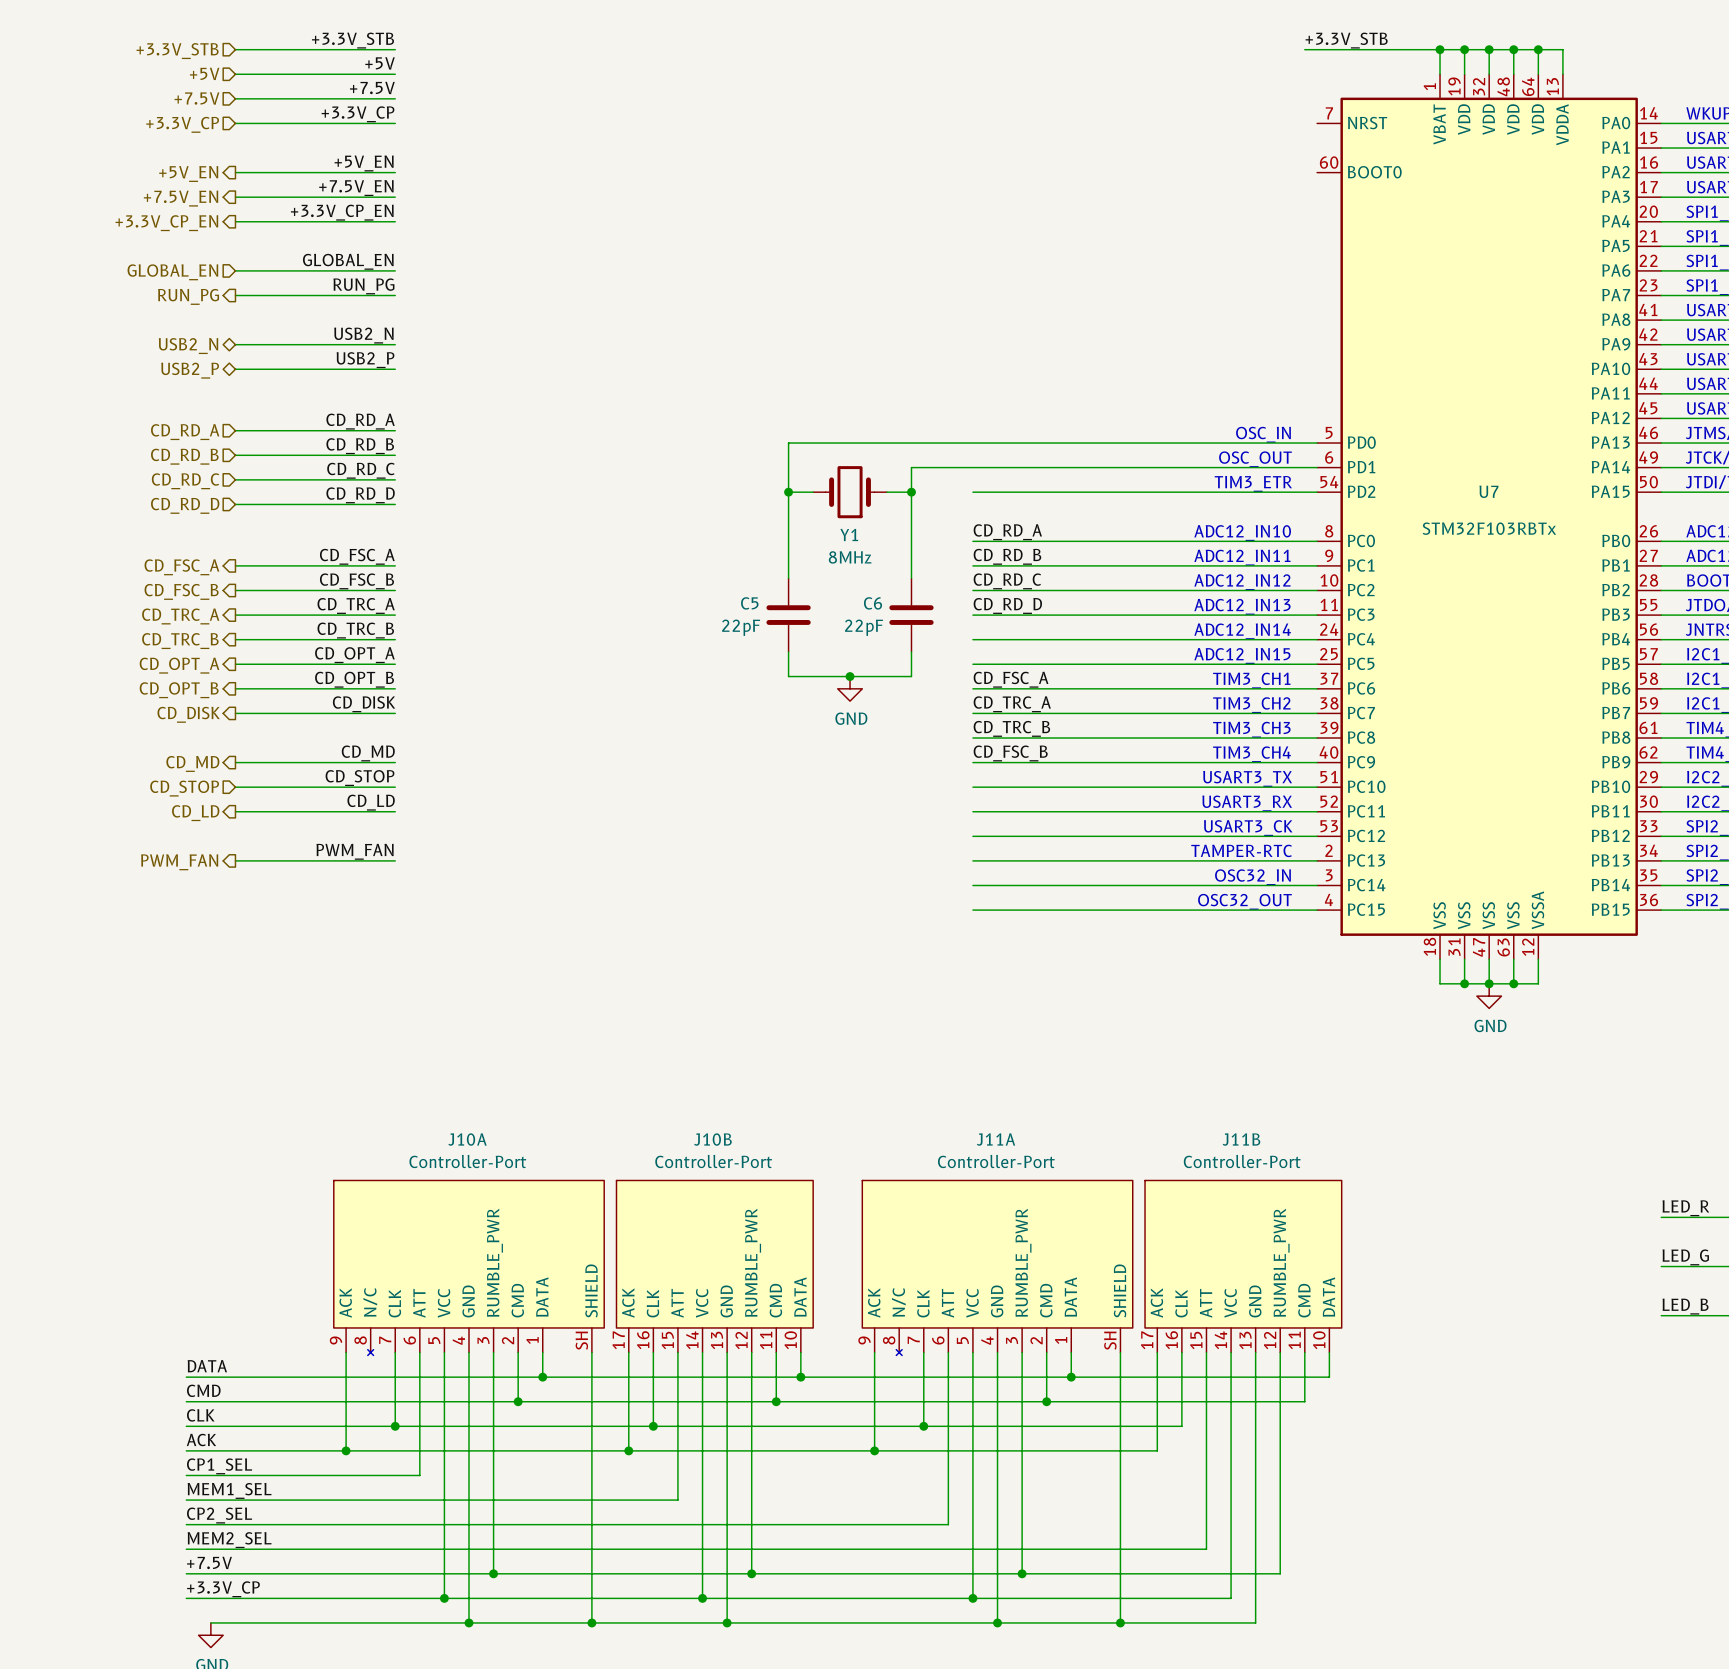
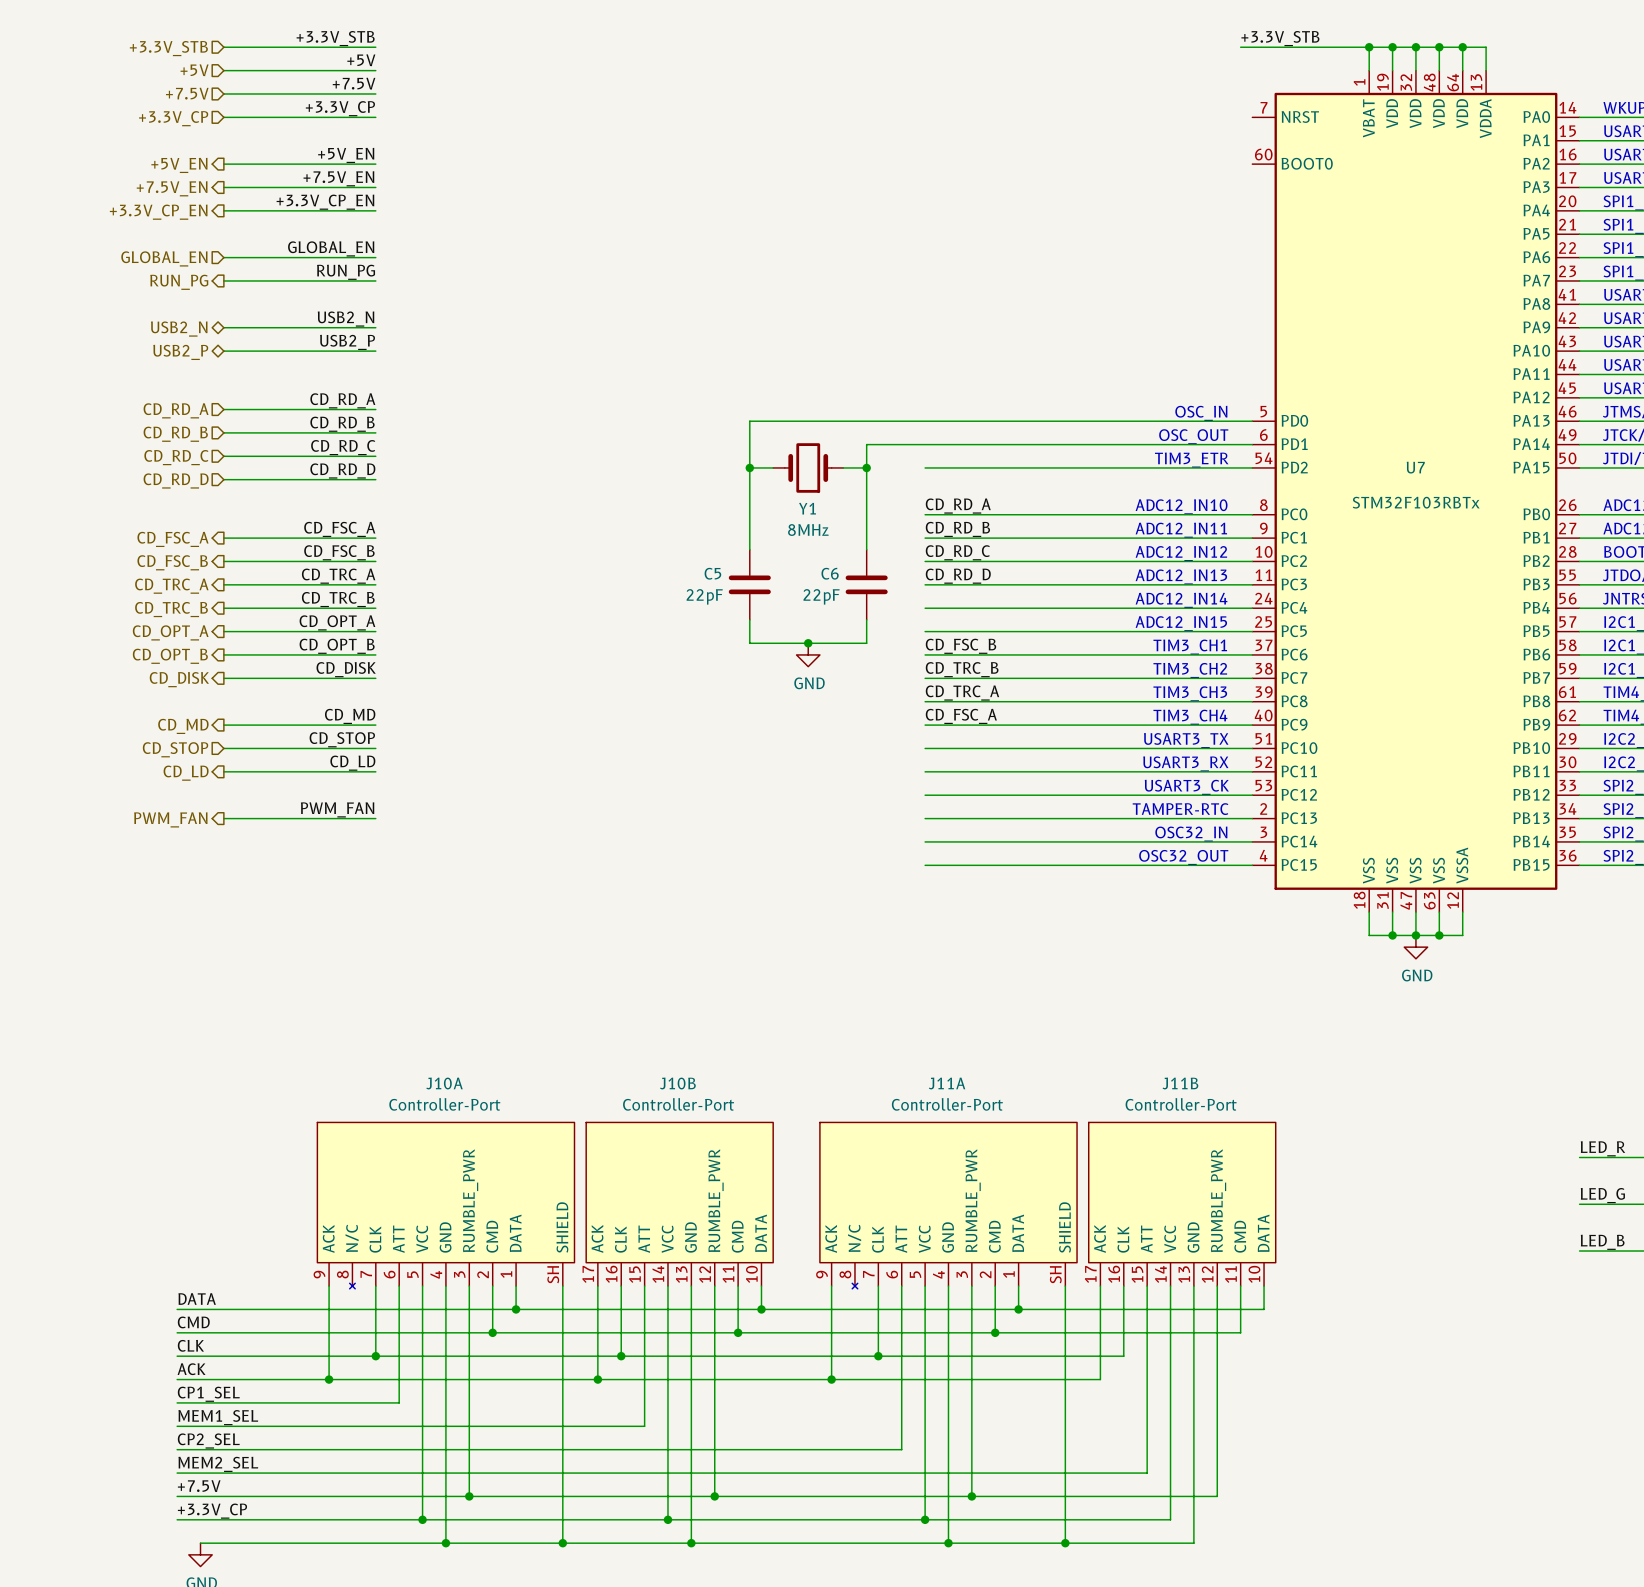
label: CD_FSC_A (1011, 679) -> CD_FSC_B (960, 646)
label: CD_TRC_A (1012, 704) -> CD_TRC_B (962, 669)
label: CD_TRC_B (1011, 728) -> CD_TRC_A (962, 693)
label: CD_FSC_B (1010, 753) -> CD_FSC_A (961, 716)

